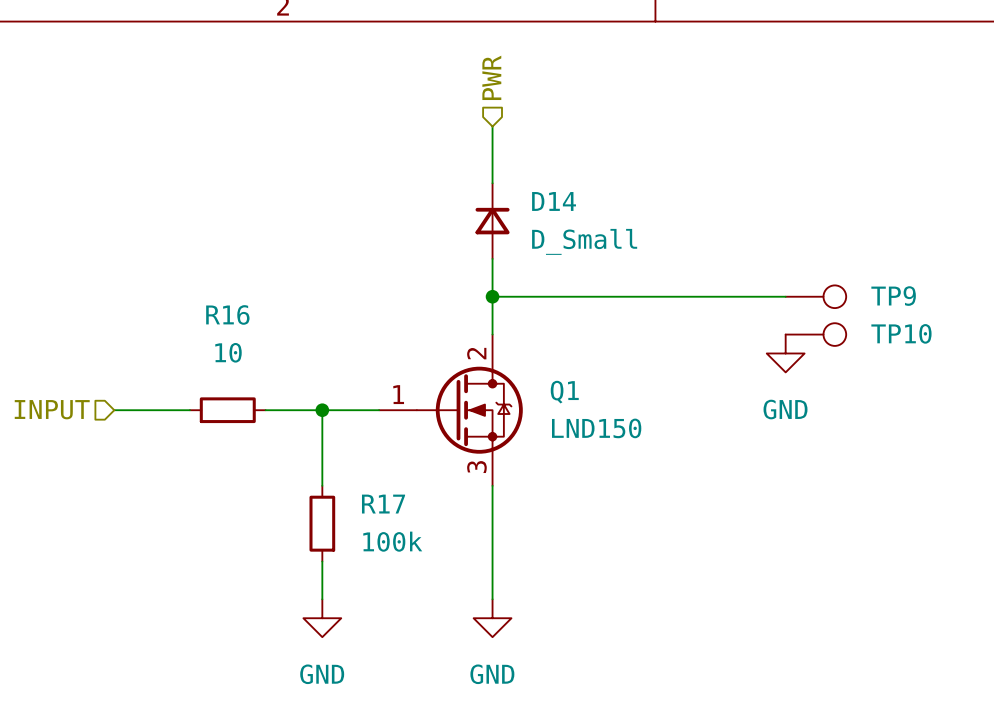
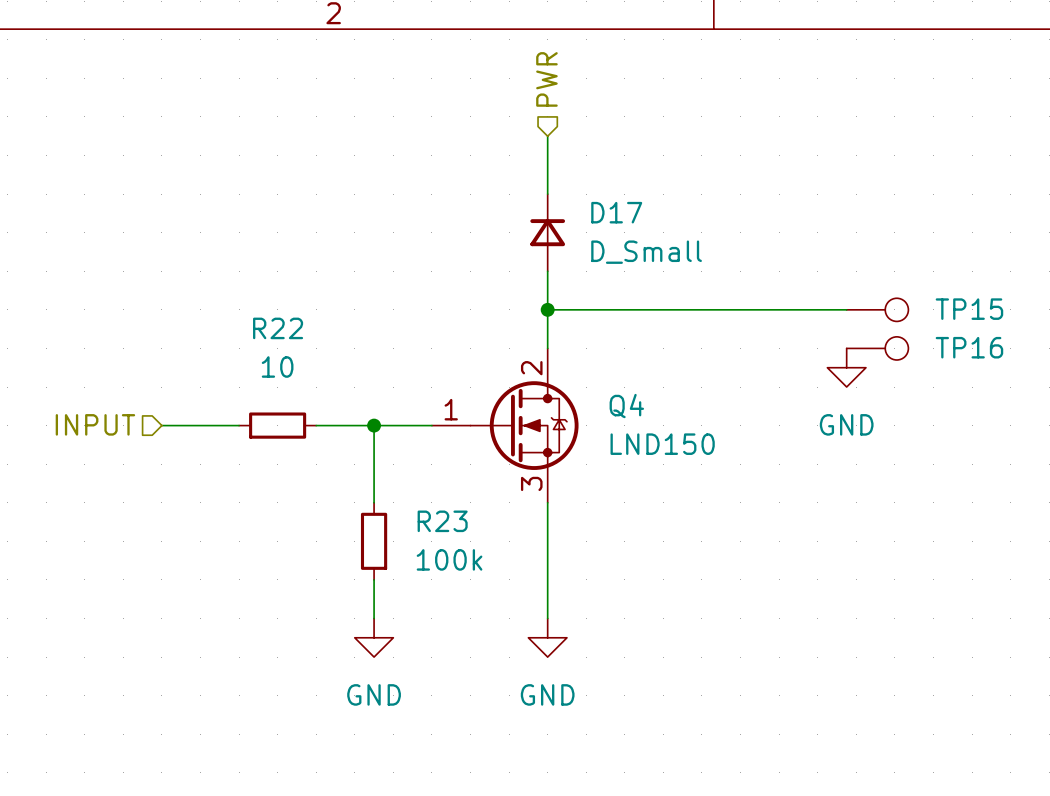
D14 name: D14 (554, 201) -> D17 (616, 212)
TP9 name: TP9 (893, 296) -> TP15 (969, 309)
R16 name: R16 (227, 314) -> R22 (278, 328)
TP10 name: TP10 (901, 333) -> TP16 (969, 347)
Q1 name: Q1 (564, 392) -> Q4 (626, 406)
R17 name: R17 (383, 504) -> R23 (442, 521)

